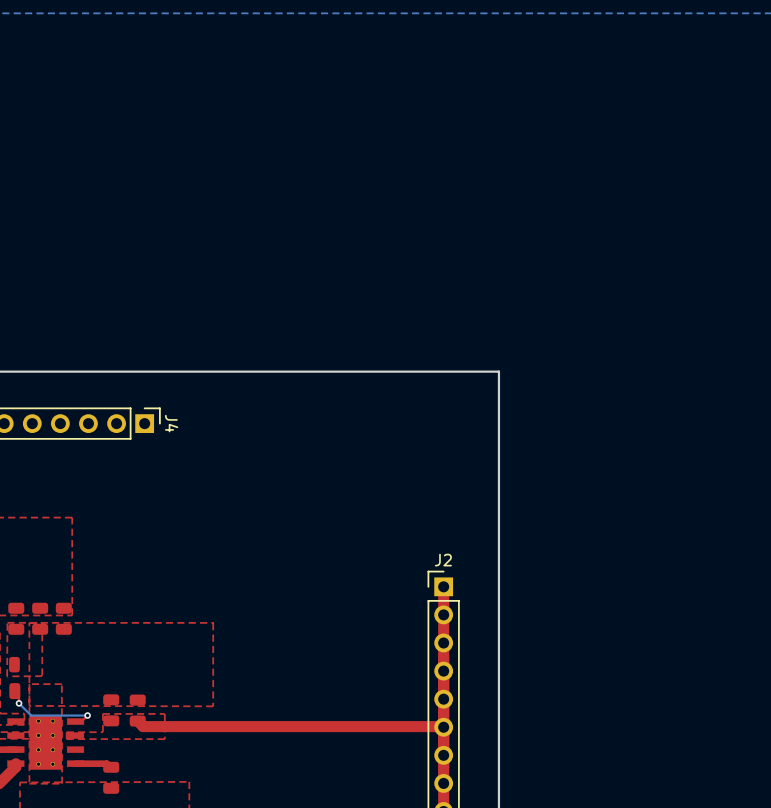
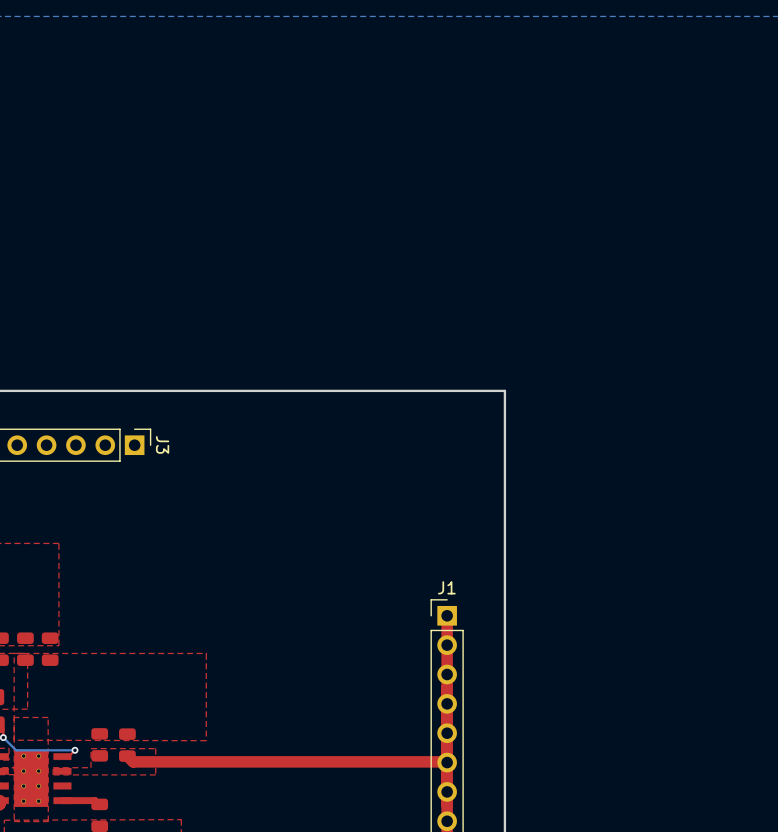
J4 name: J4 (171, 423) -> J3 (162, 444)
J2 name: J2 (443, 560) -> J1 (446, 587)

